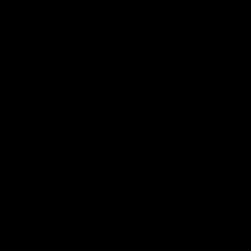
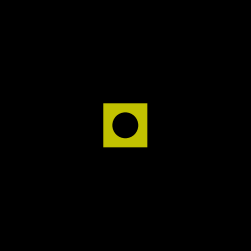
part: none -> (125, 125)

